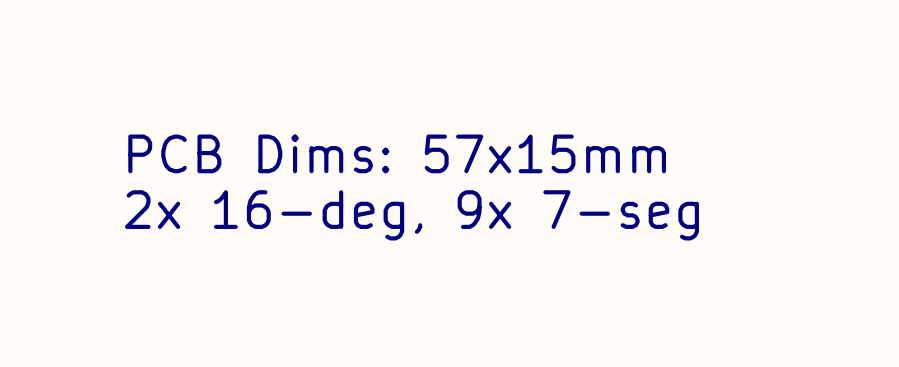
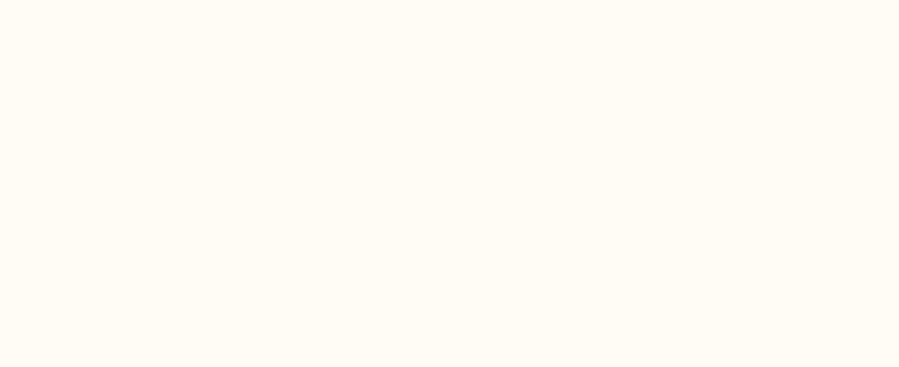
text: PCB Dims: 57x15mm (397, 153) -> none
text: 2x 16-deg, 9x 7-seg (411, 215) -> none

